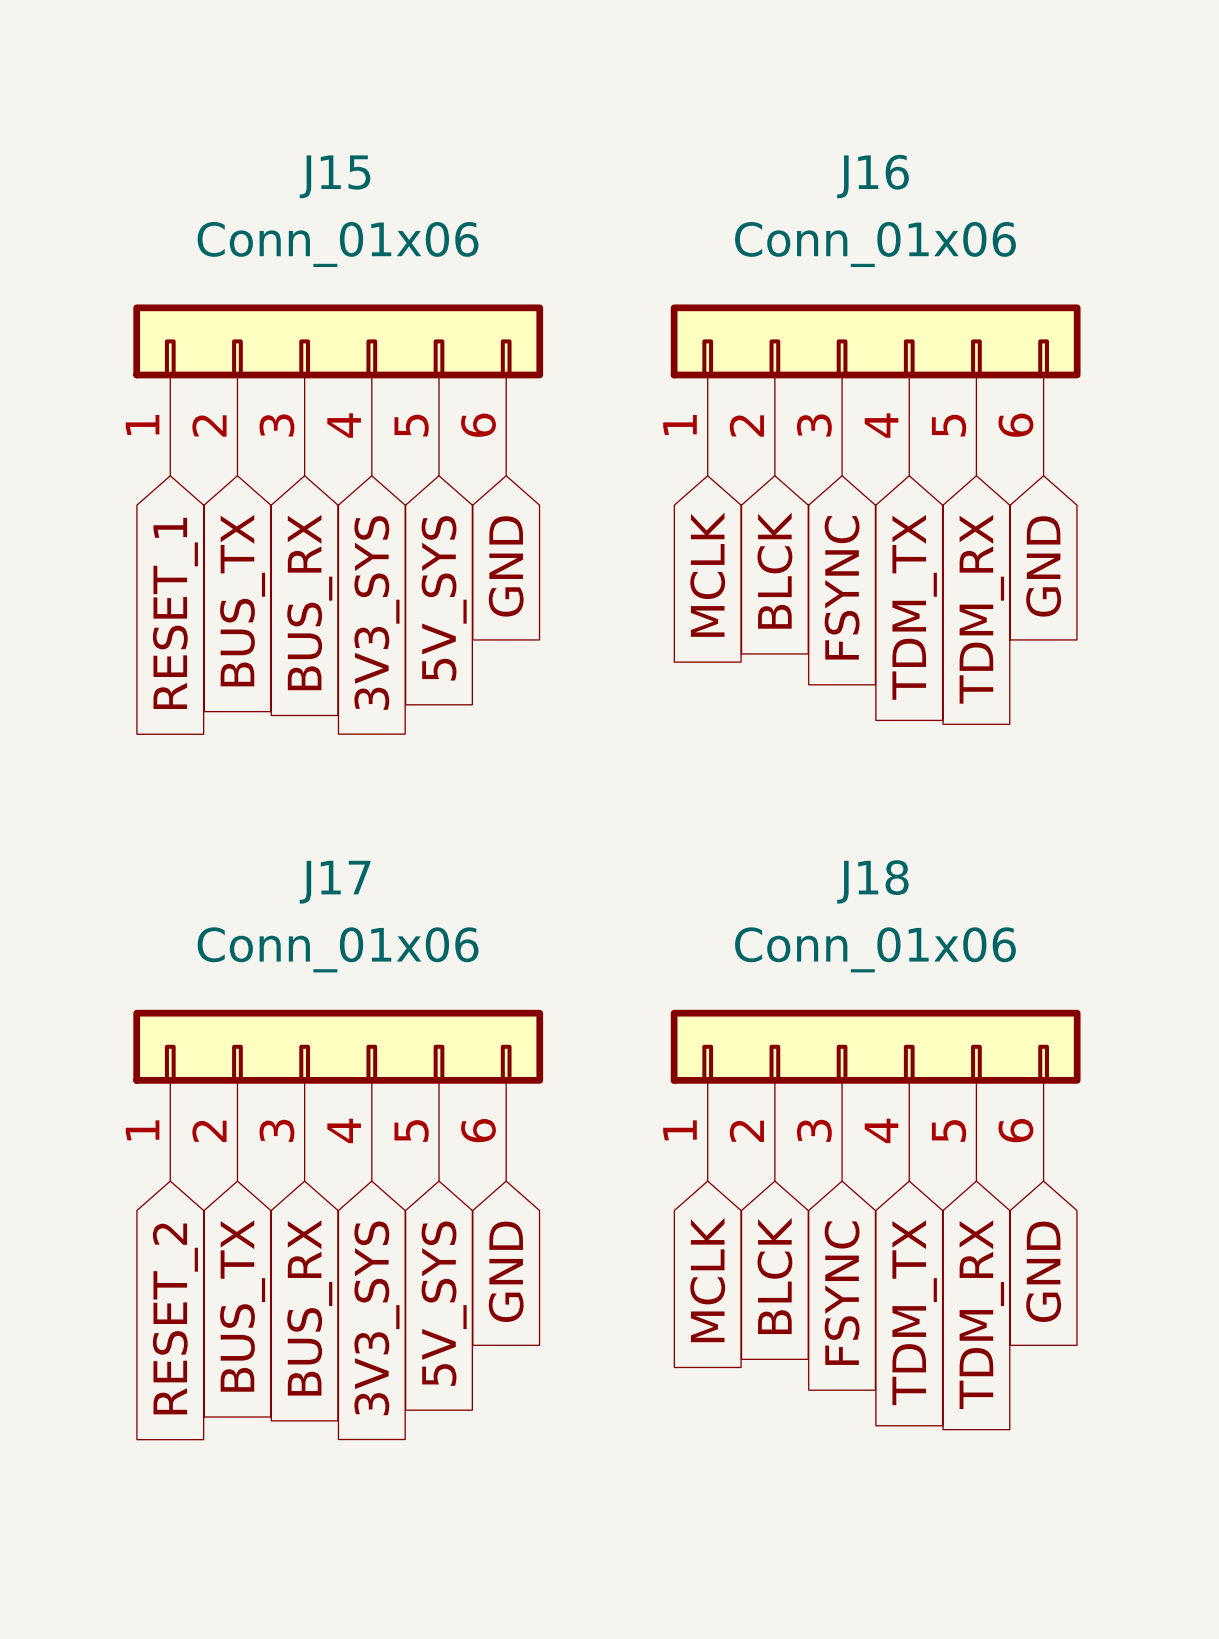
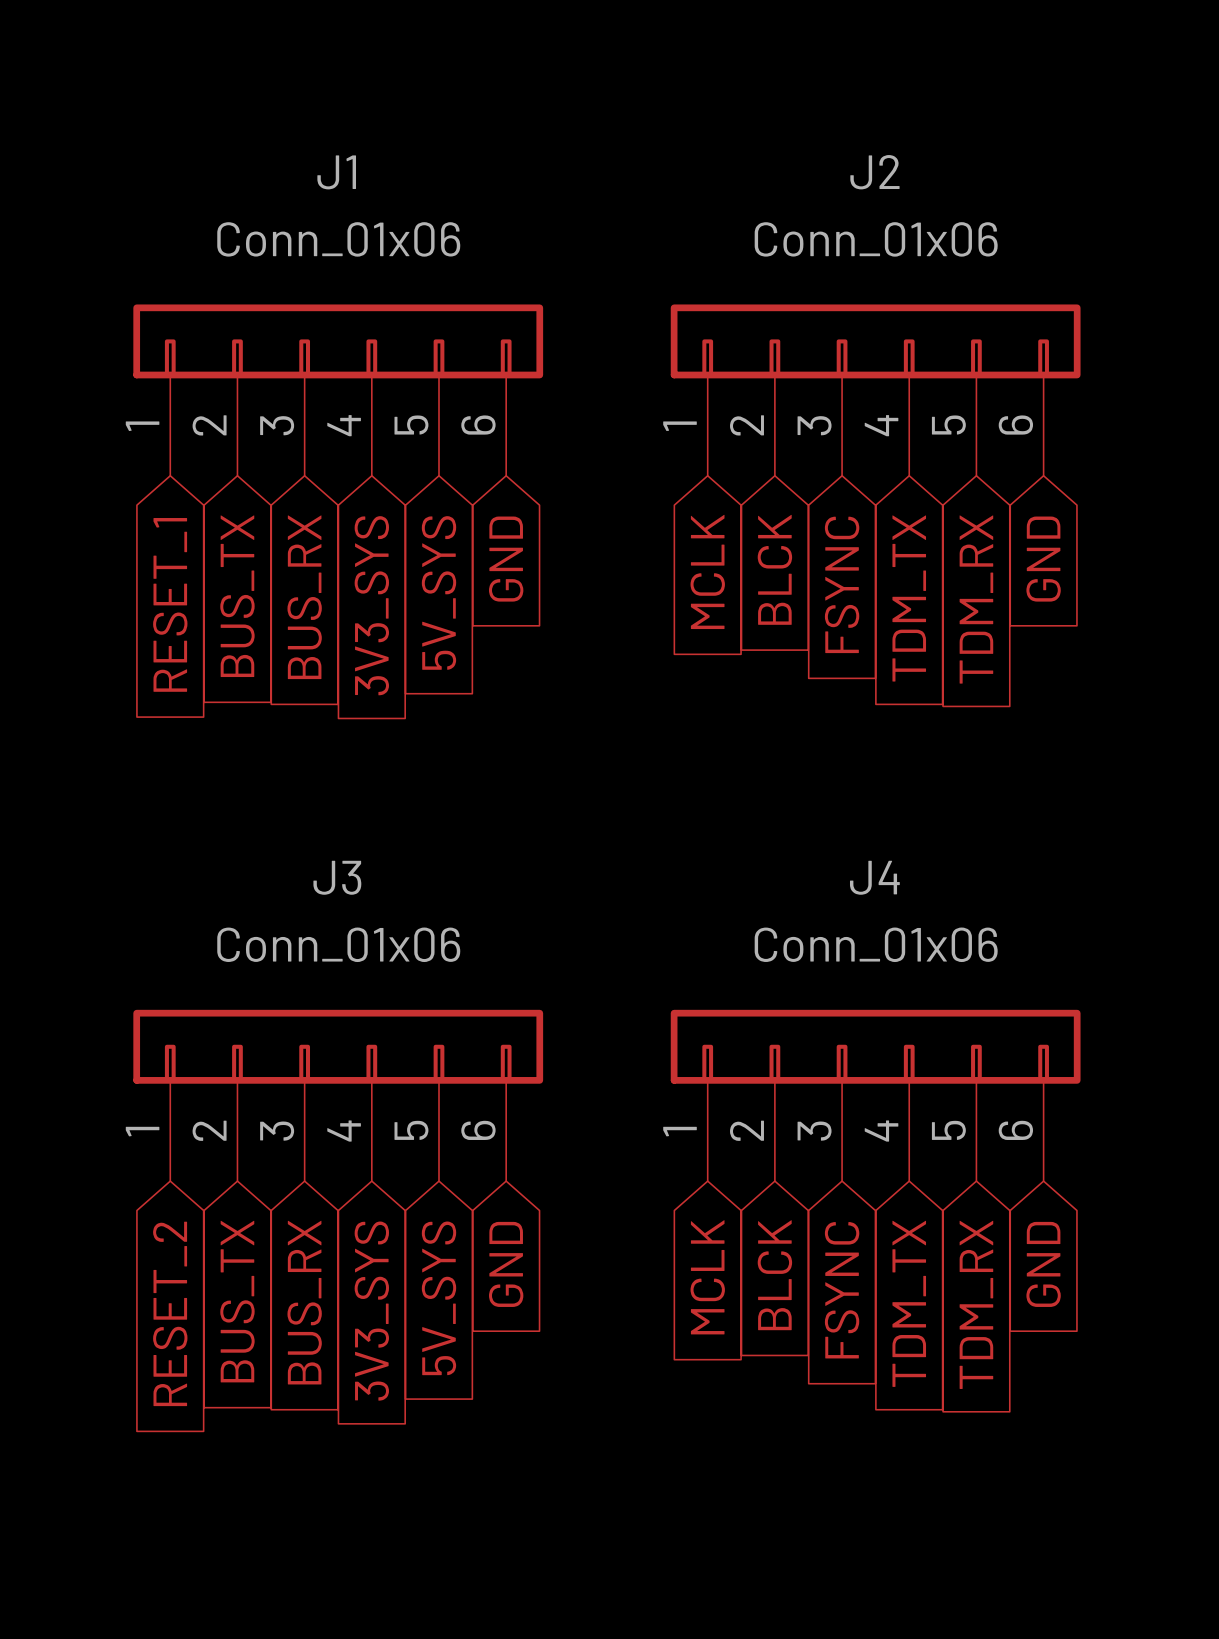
J15 name: J15 (335, 176) -> J1 (336, 172)
J16 name: J16 (873, 176) -> J2 (874, 172)
J18 name: J18 (872, 881) -> J4 (874, 877)
J17 name: J17 (335, 882) -> J3 (337, 877)

